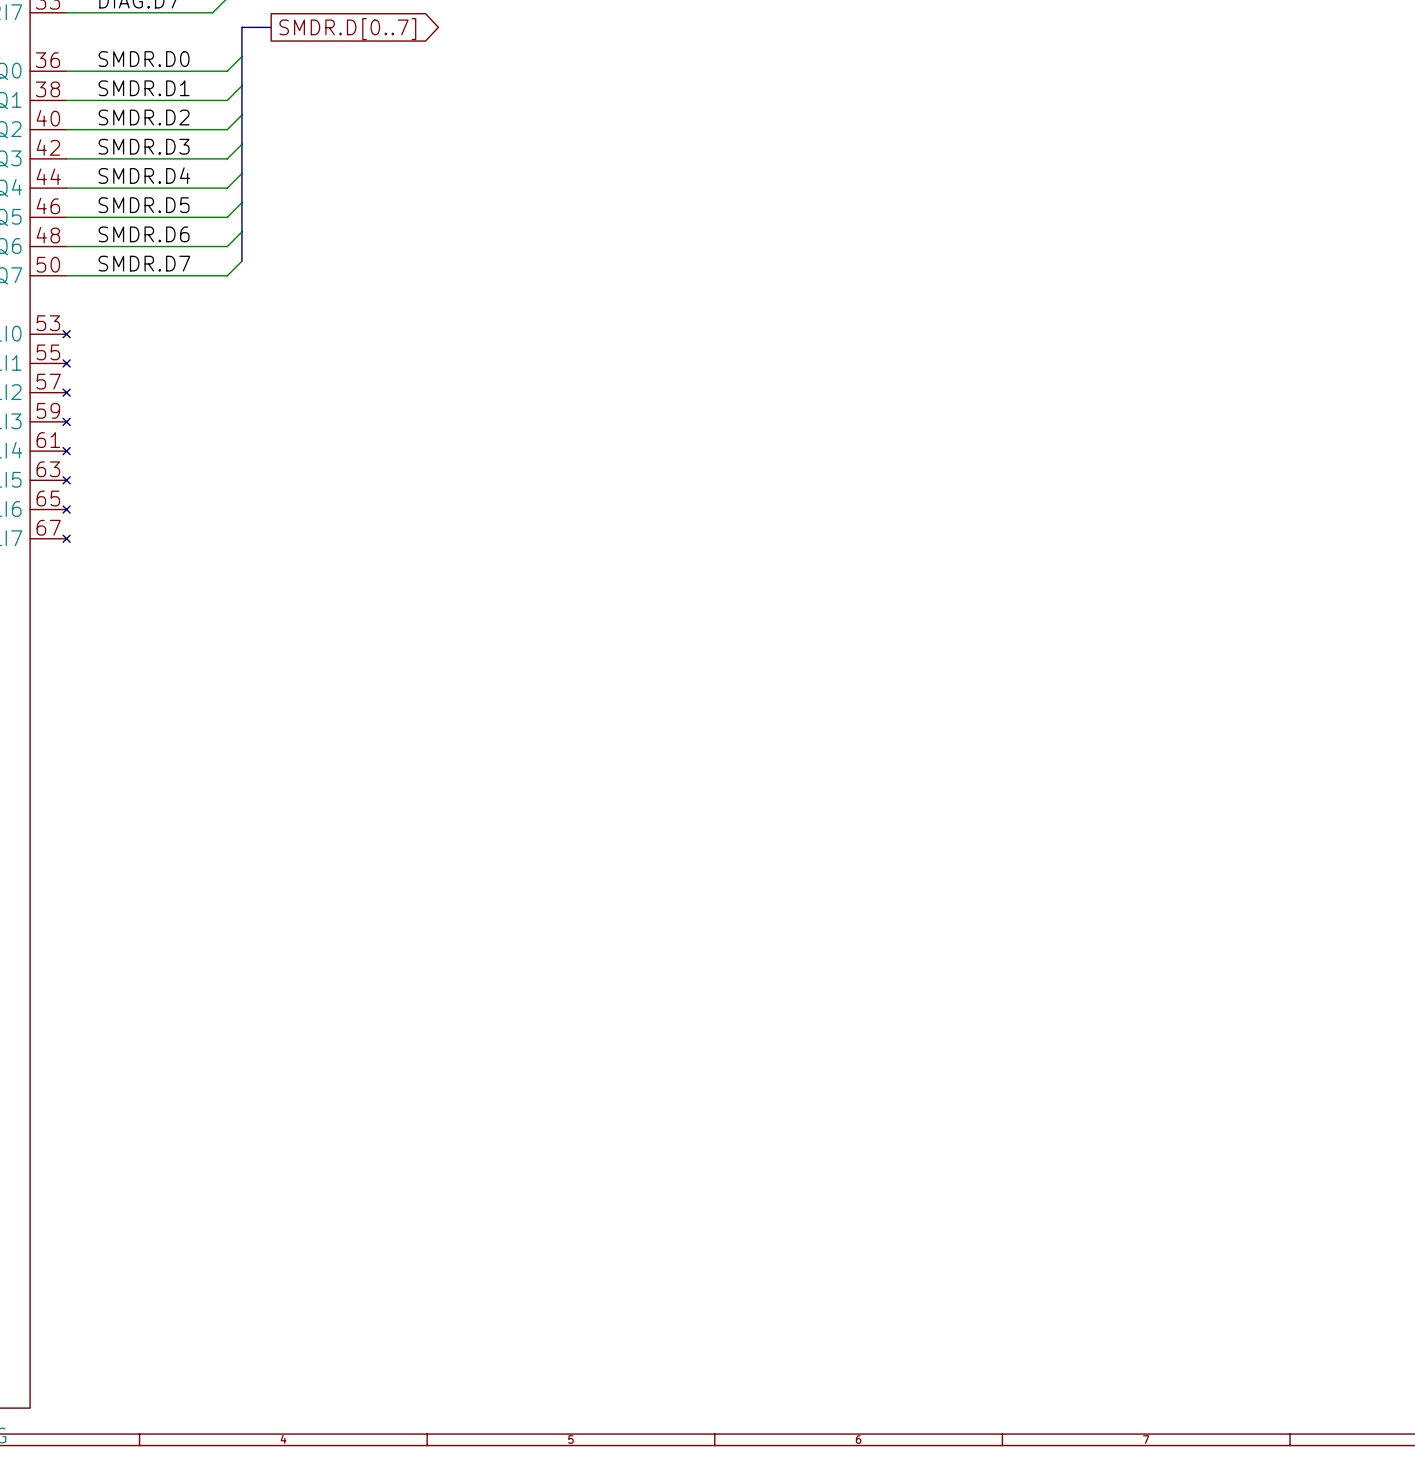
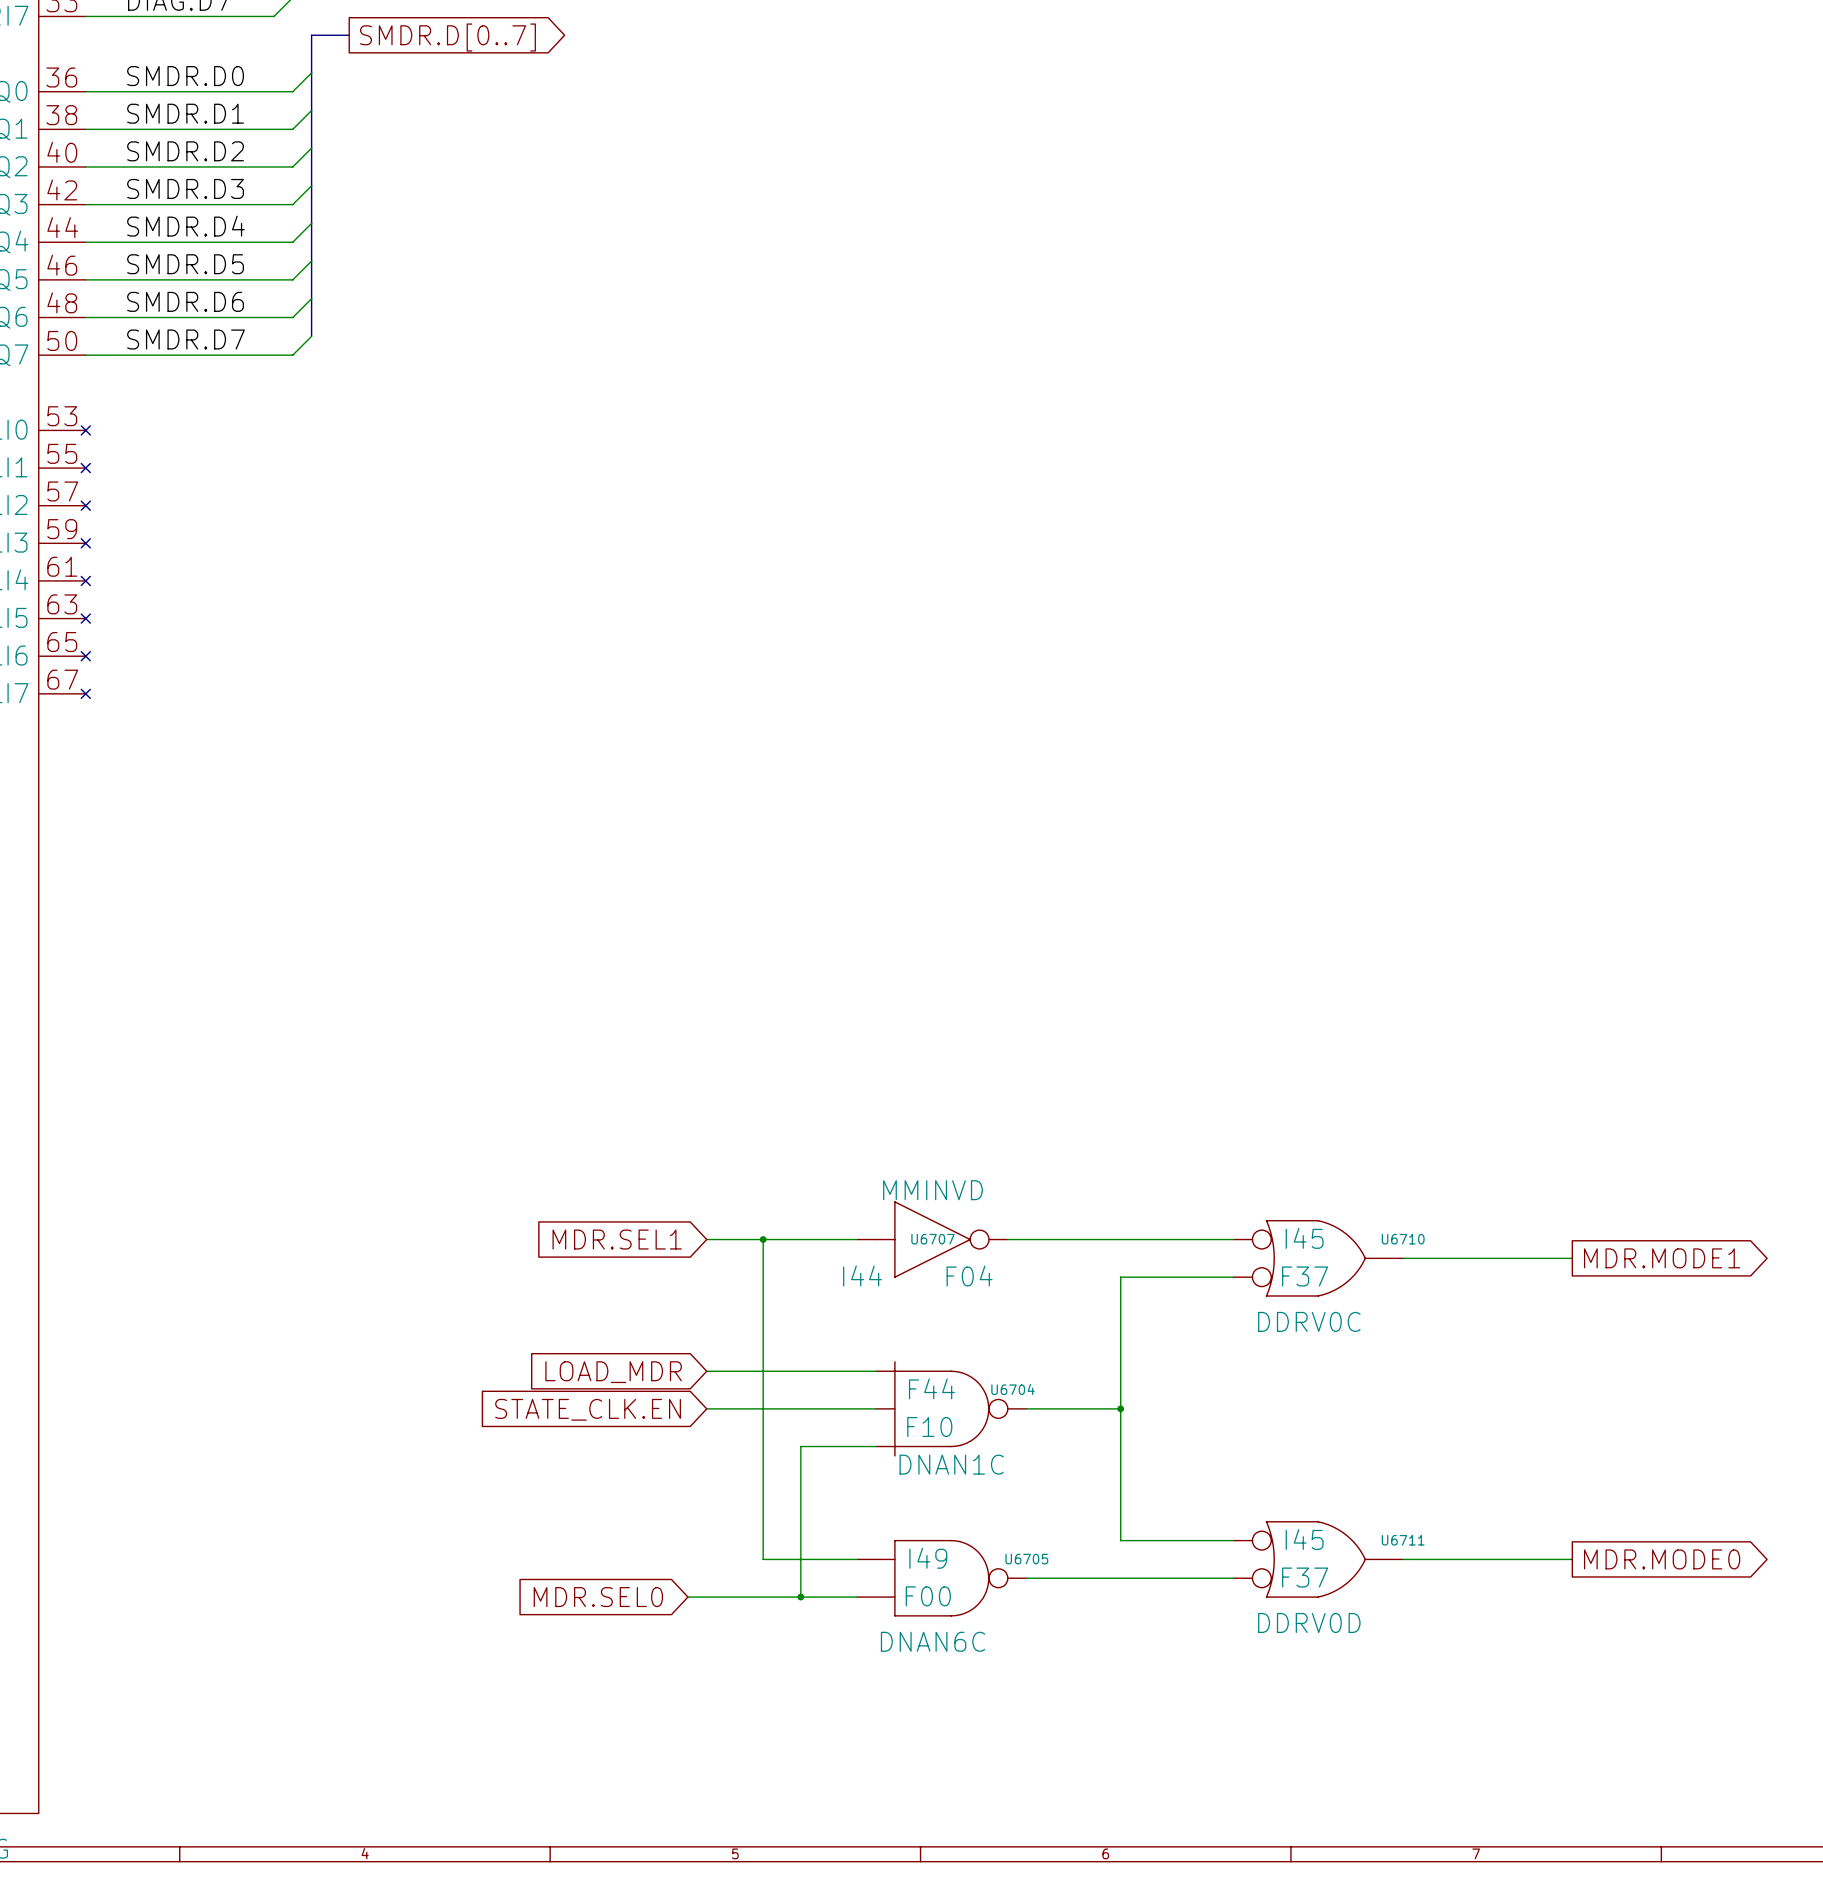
global label: none -> MDR.SEL1 (617, 1239)
wire: none -> (706, 1239) (857, 1239)
wire: none -> (763, 1239) (763, 1559) (857, 1559)
junction: none -> (763, 1239)
U6707: none -> F04 (932, 1239)
wire: none -> (1007, 1239) (1233, 1239)
U6710: none -> F37 (1318, 1258)
wire: none -> (1402, 1258) (1572, 1258)
global label: none -> MDR.MODE1 (1662, 1258)
wire: none -> (1233, 1277) (1120, 1277) (1120, 1540) (1233, 1540)
wire: none -> (706, 1371) (876, 1371)
global label: none -> LOAD_MDR (613, 1372)
wire: none -> (706, 1408) (876, 1408)
U6704: none -> F10 (951, 1408)
wire: none -> (1026, 1408) (1120, 1408)
junction: none -> (1120, 1408)
global label: none -> STATE_CLK.EN (588, 1409)
wire: none -> (876, 1446) (800, 1446) (800, 1597)
U6711: none -> F37 (1318, 1559)
wire: none -> (1402, 1559) (1572, 1559)
global label: none -> MDR.MODE0 (1662, 1559)
U6705: none -> F00 (941, 1578)
wire: none -> (1026, 1578) (1233, 1578)
global label: none -> MDR.SEL0 (598, 1597)
wire: none -> (687, 1597) (857, 1597)
junction: none -> (800, 1597)

